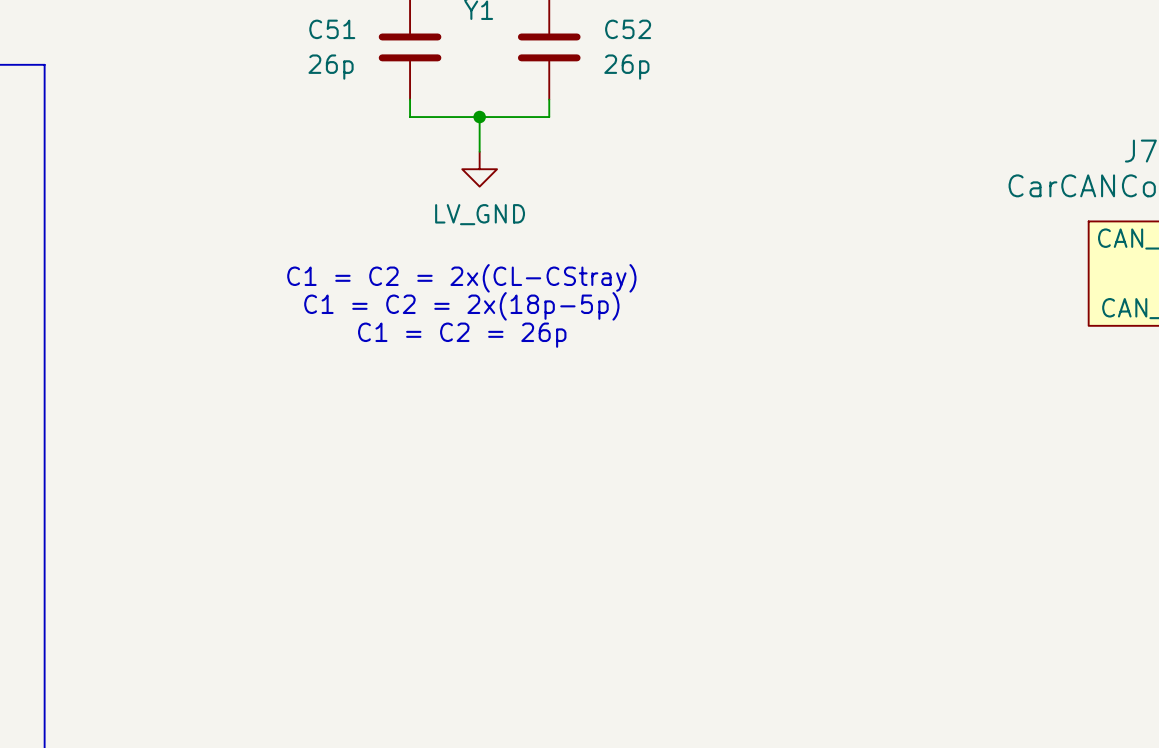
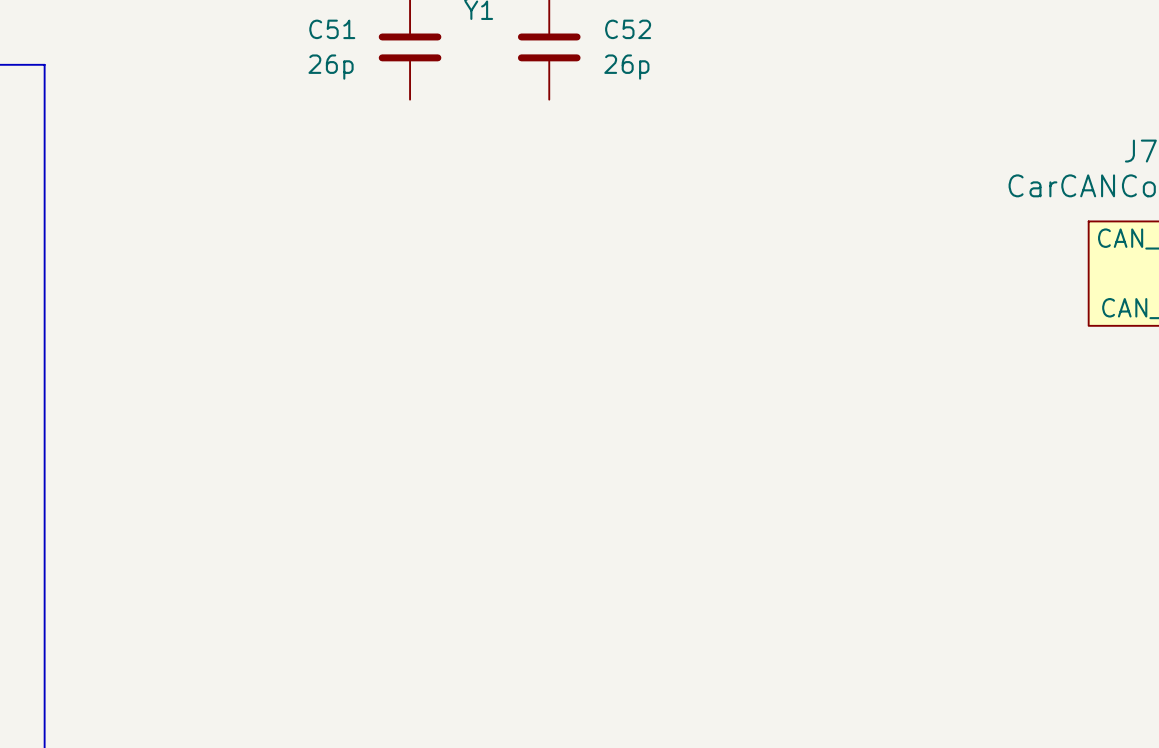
wire: (410, 99) (410, 117) (549, 117) (549, 99) -> none
wire: (479, 117) (479, 151) -> none
junction: (479, 117) -> none
power symbol: LV_GND (479, 169) -> none
text: C1 = C2 = 2x(CL-CStray) (461, 278) -> none
text: C1 = C2 = 2x(18p-5p) (461, 306) -> none
text: C1 = C2 = 26p (462, 335) -> none

